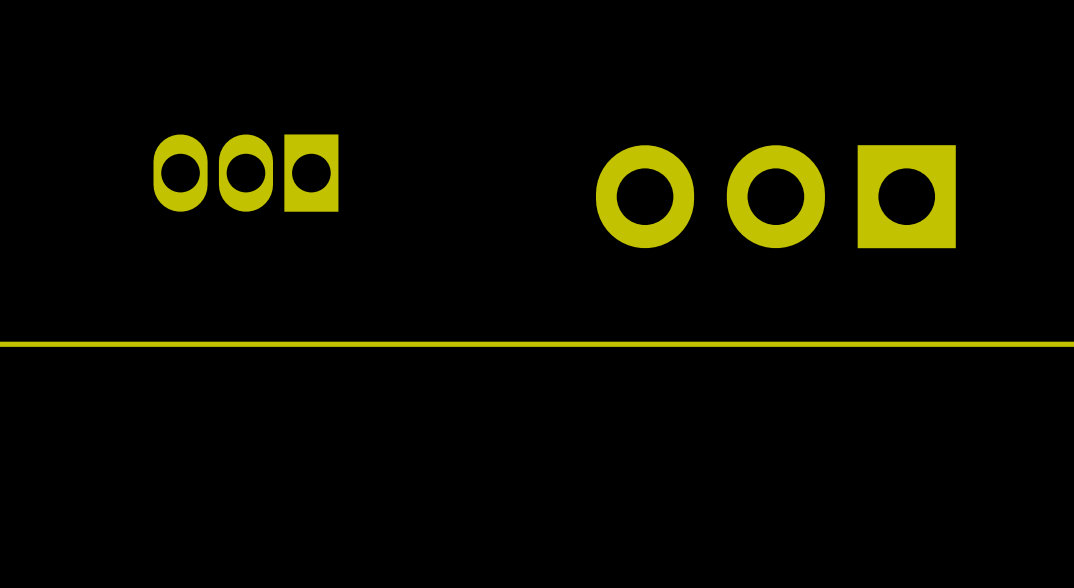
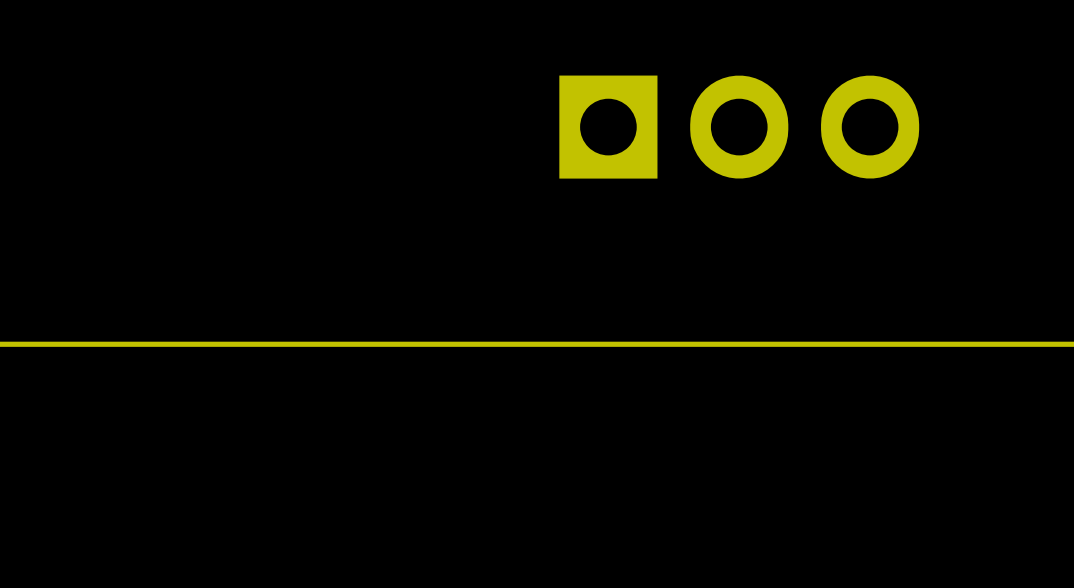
part: (245, 173) -> none
part rotation: 0° (775, 196) -> 180° (739, 127)

